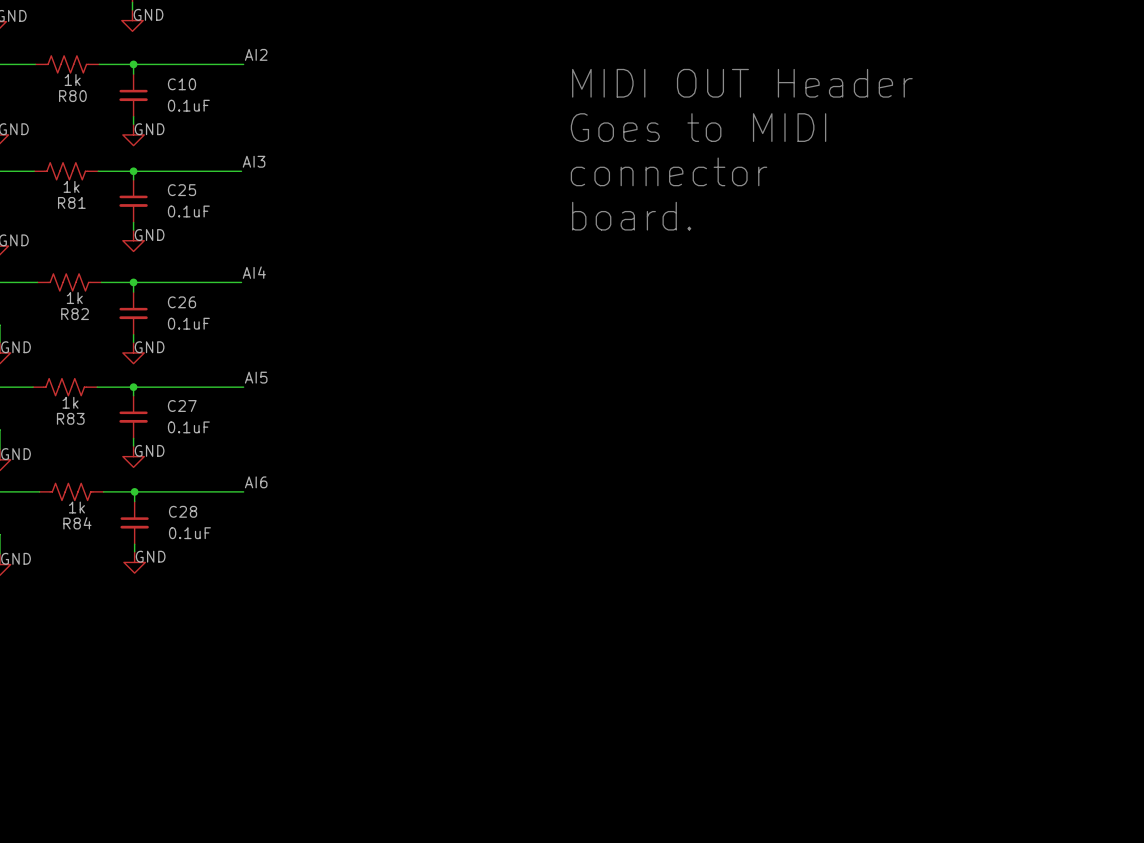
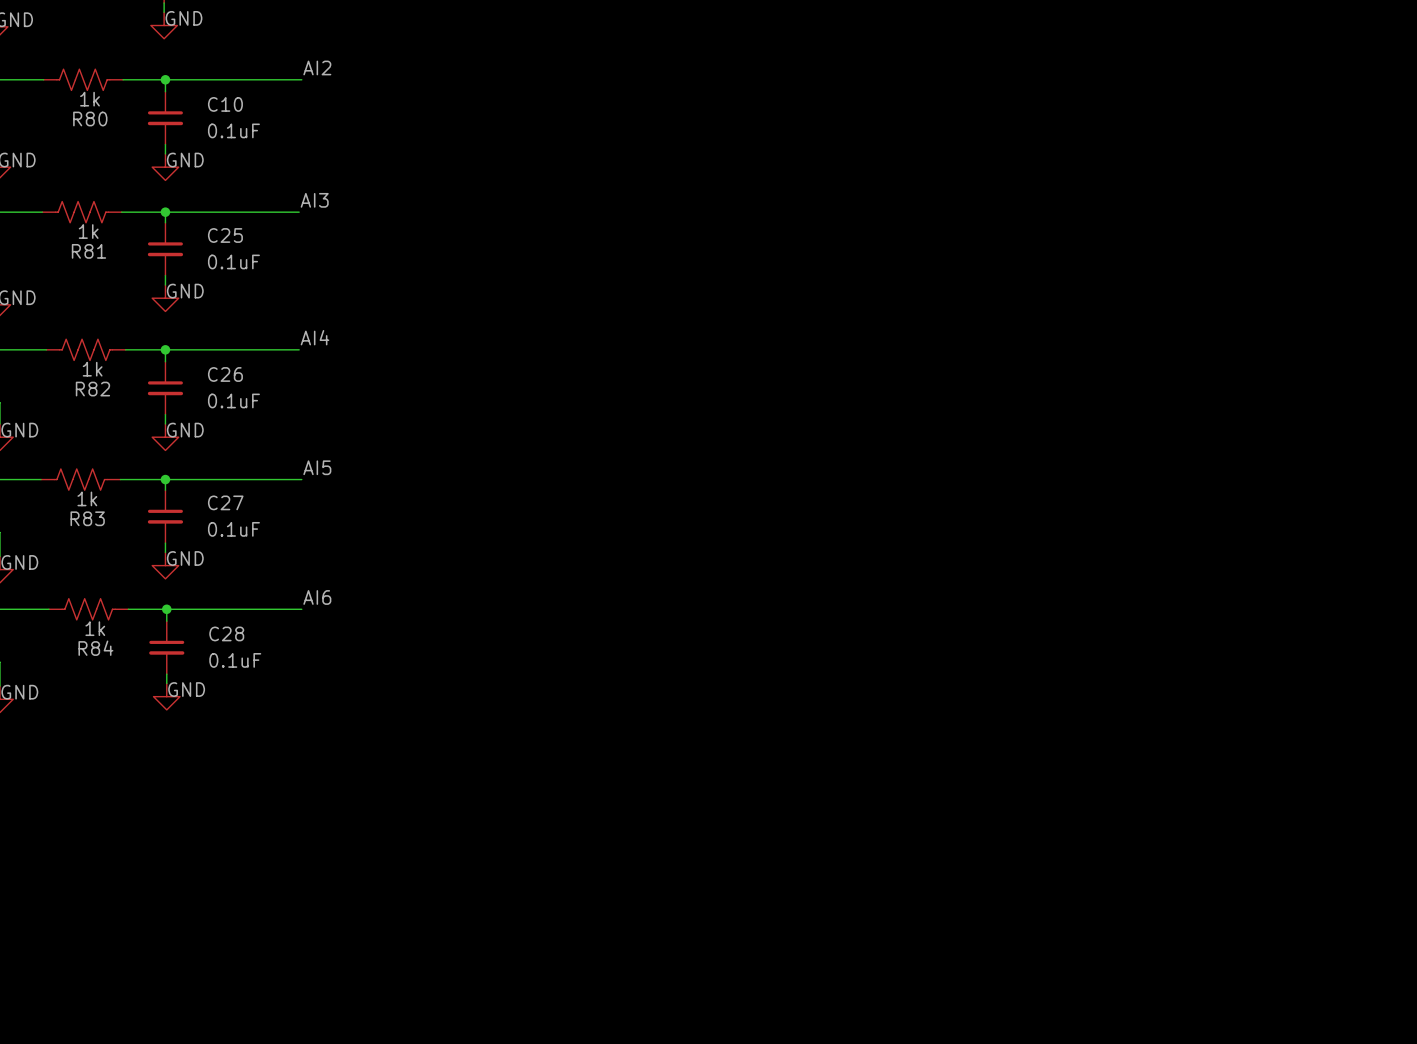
text: MIDI OUT Header (742, 83) -> none
text: Goes to MIDI (698, 127) -> none
text: connector (669, 171) -> none
text: board. (631, 216) -> none

